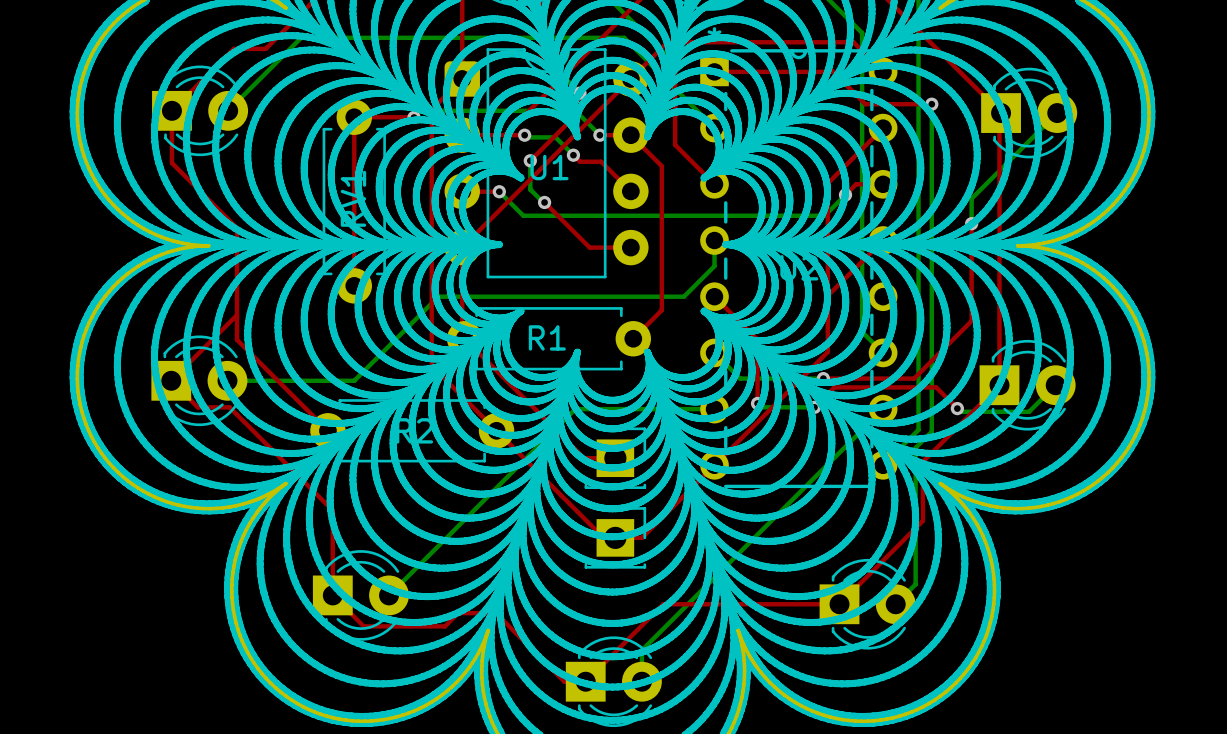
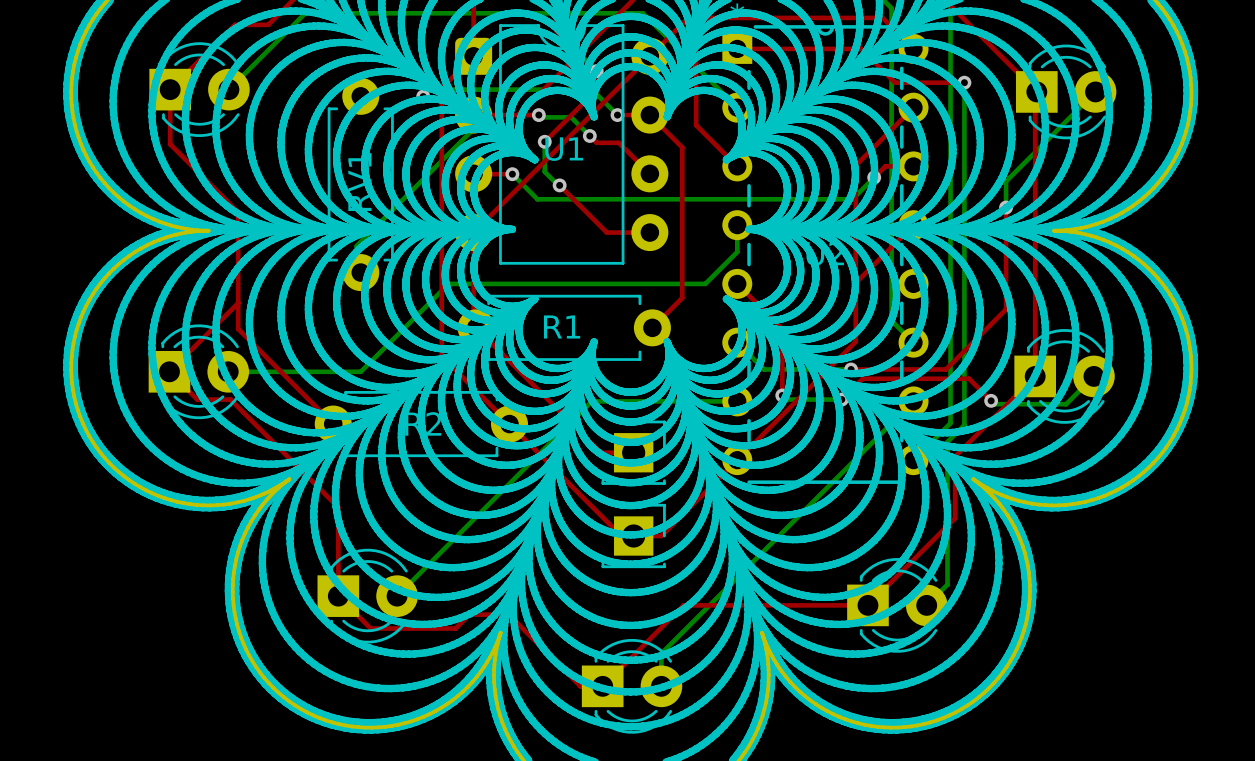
top track: (413, 117) (354, 117) (354, 285) -> none
bottom track: none -> (473, 115) (473, 128) (356, 246)

